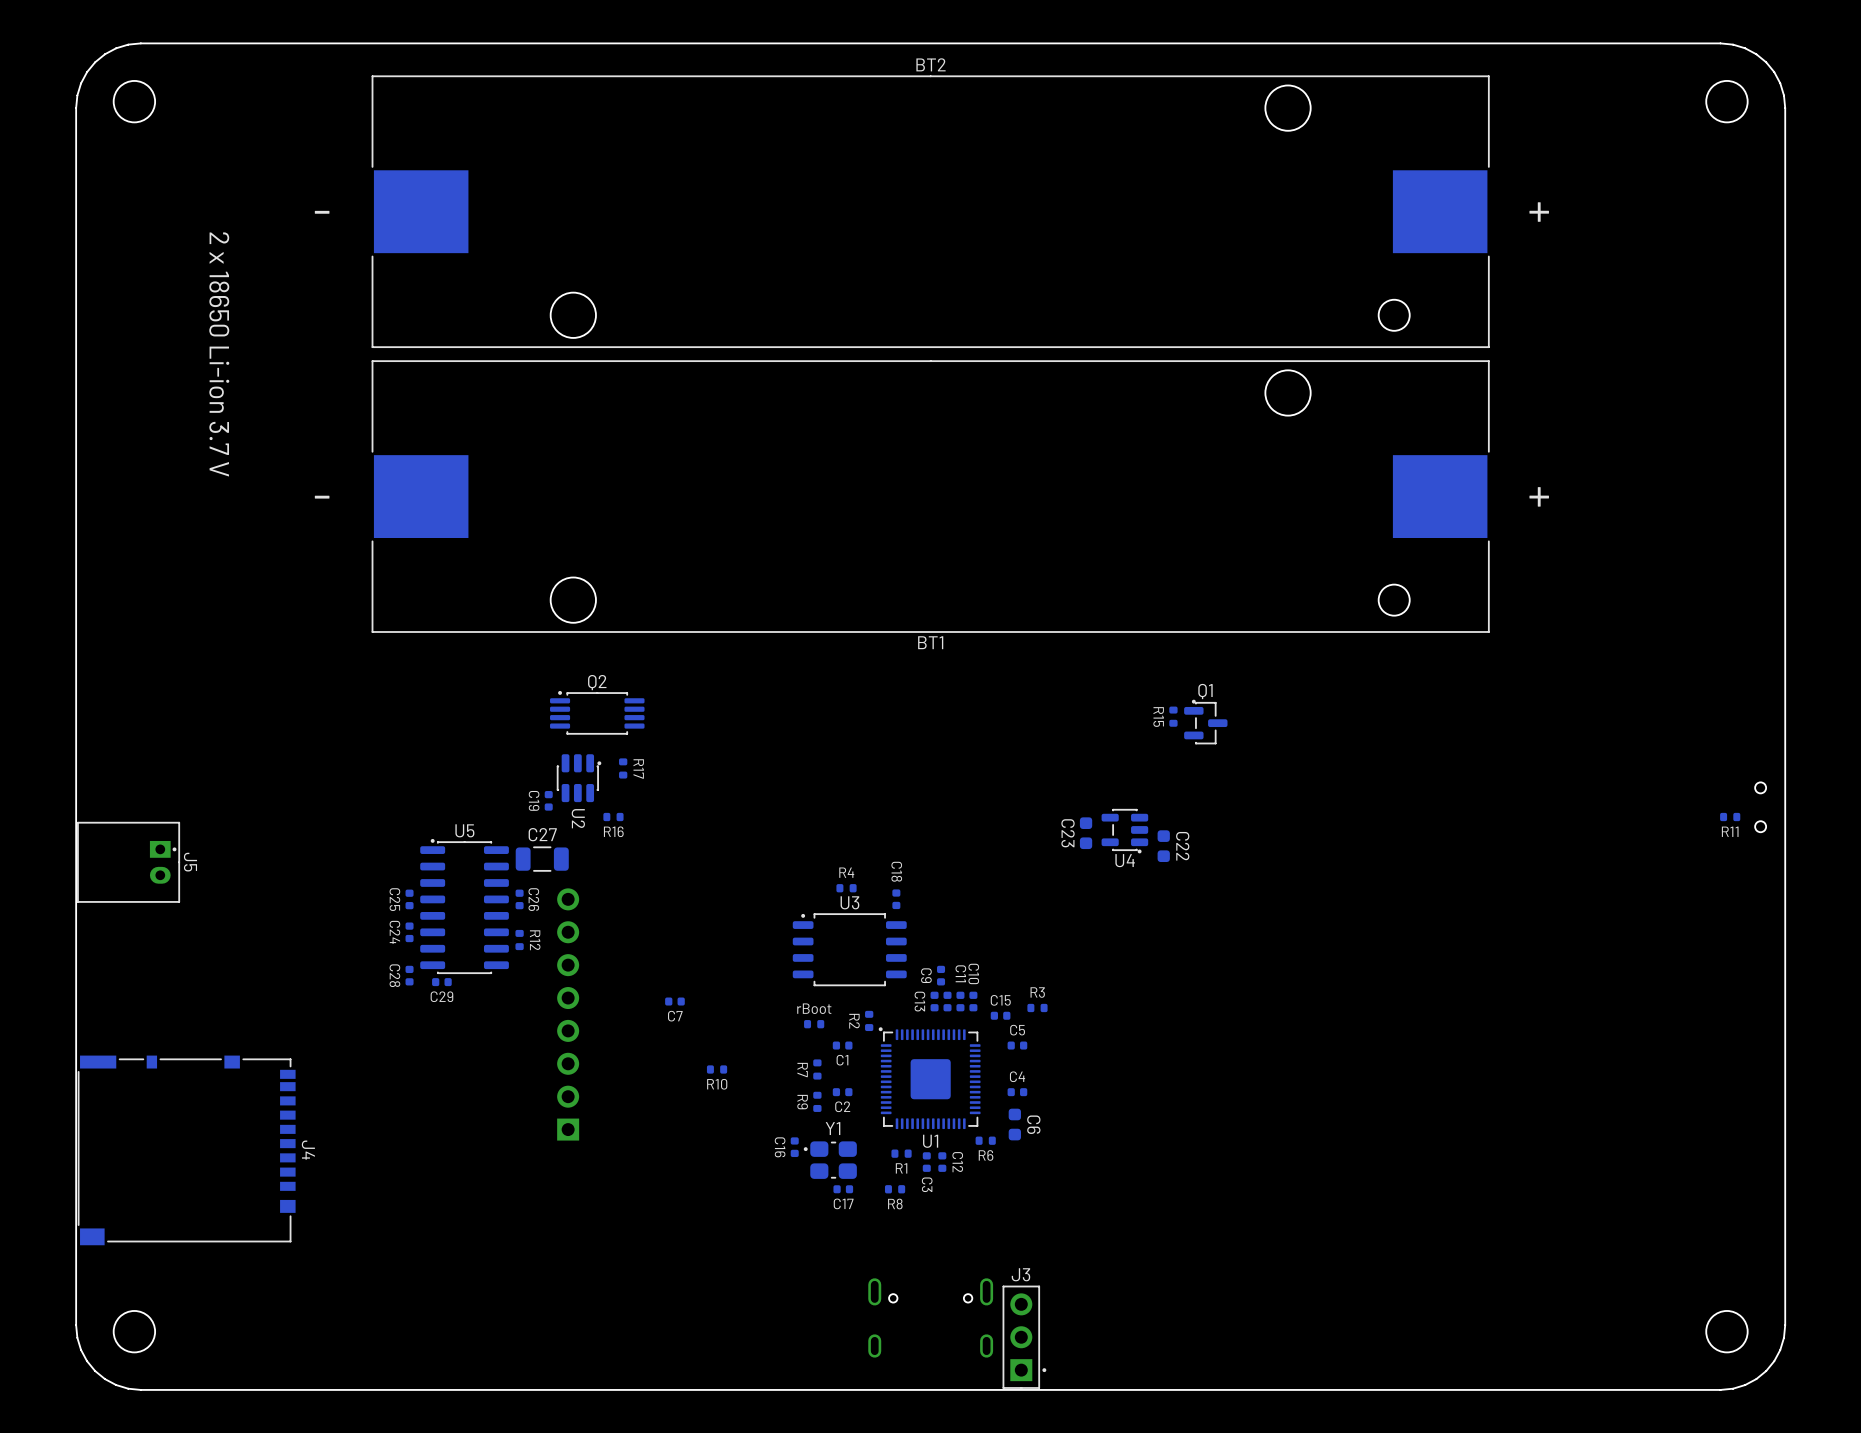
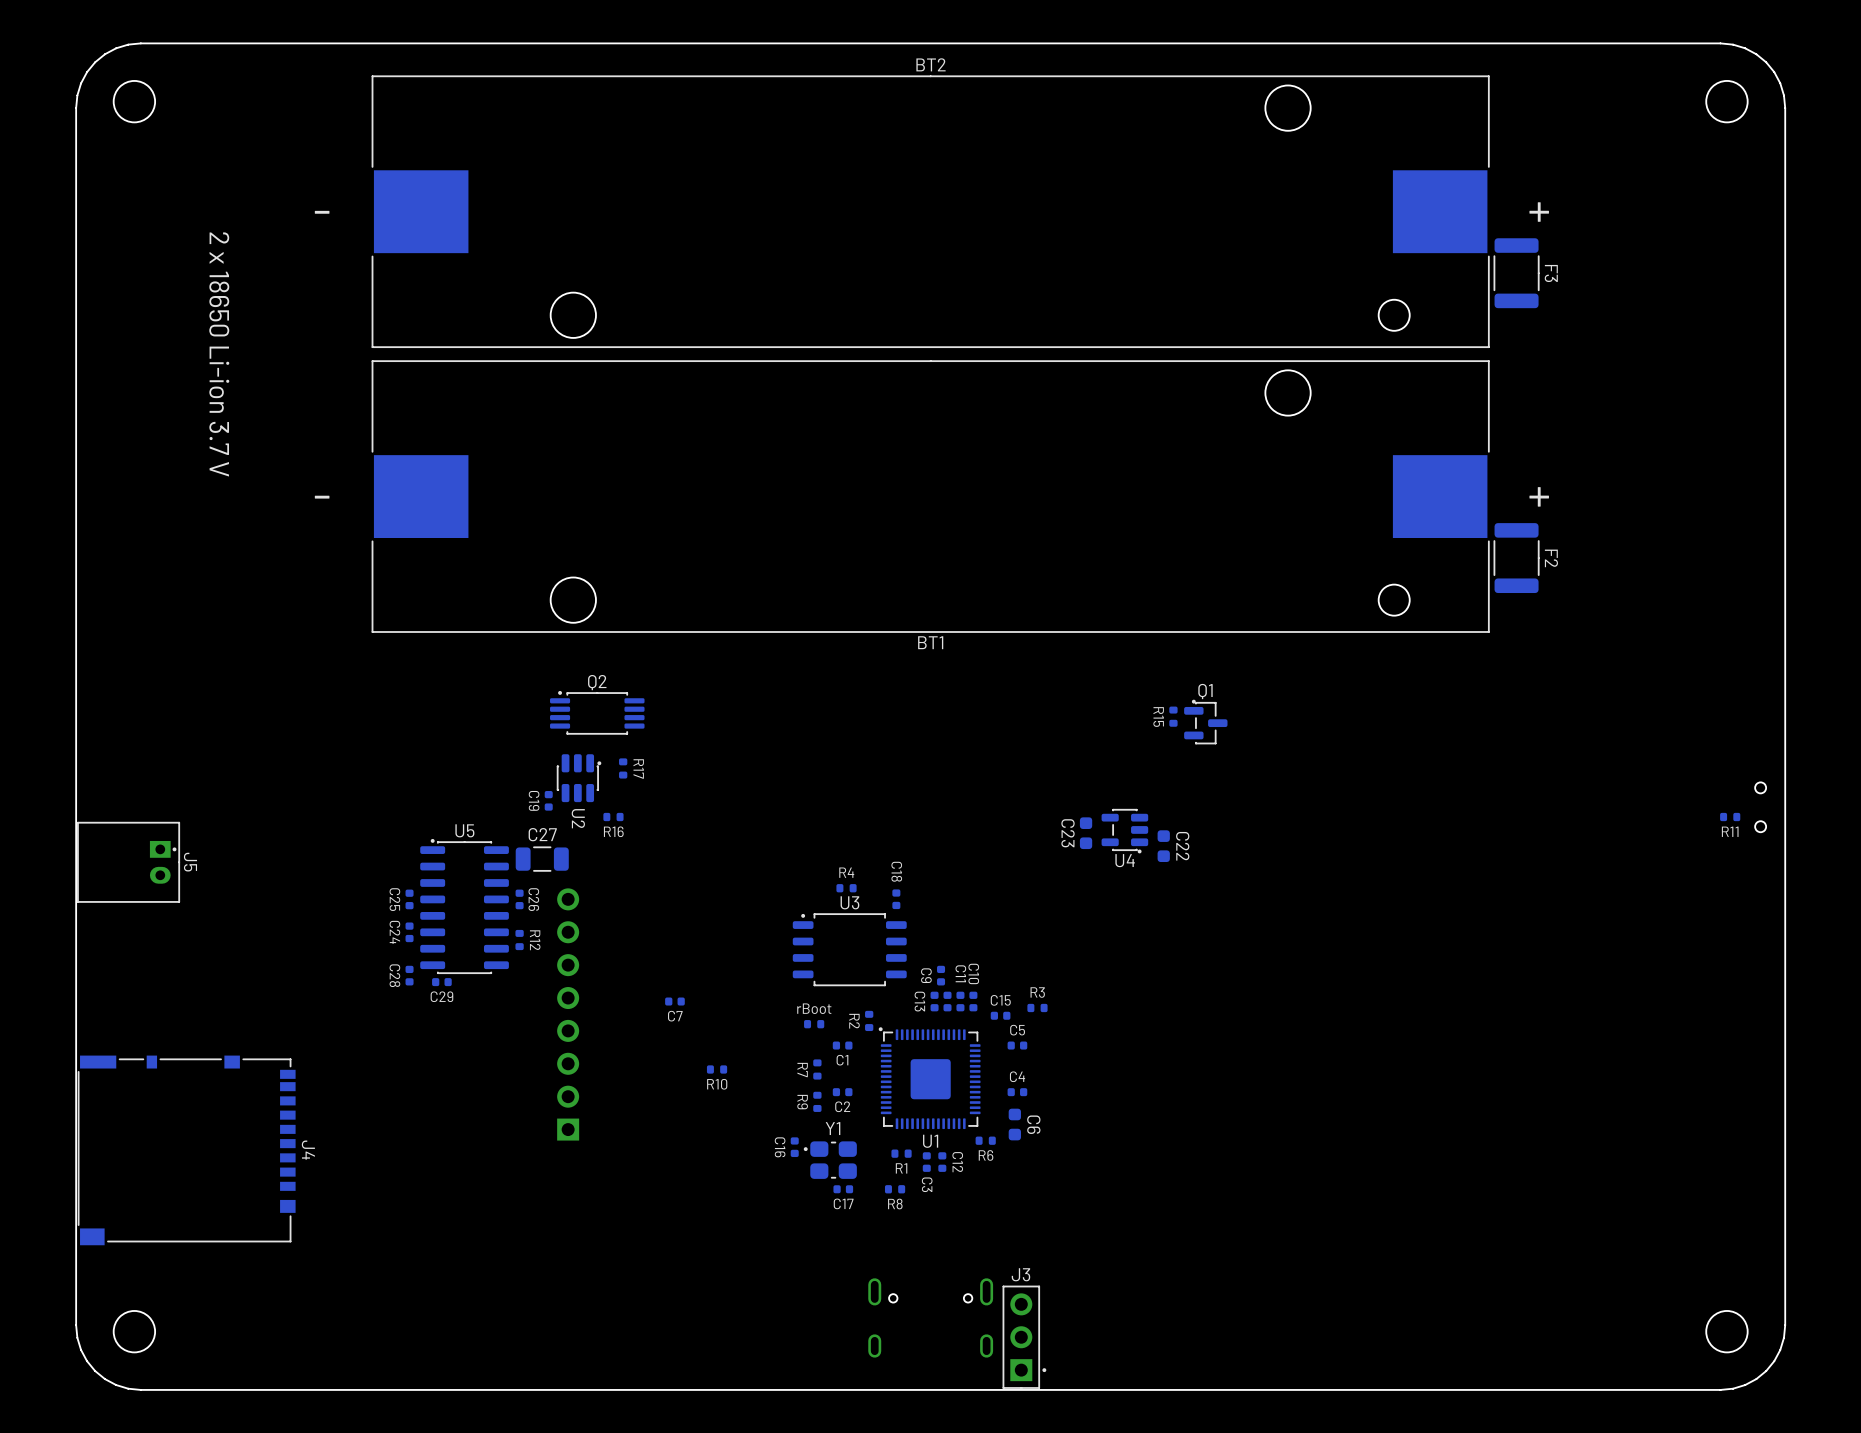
F3: none -> (1516, 273)
F2: none -> (1516, 558)

